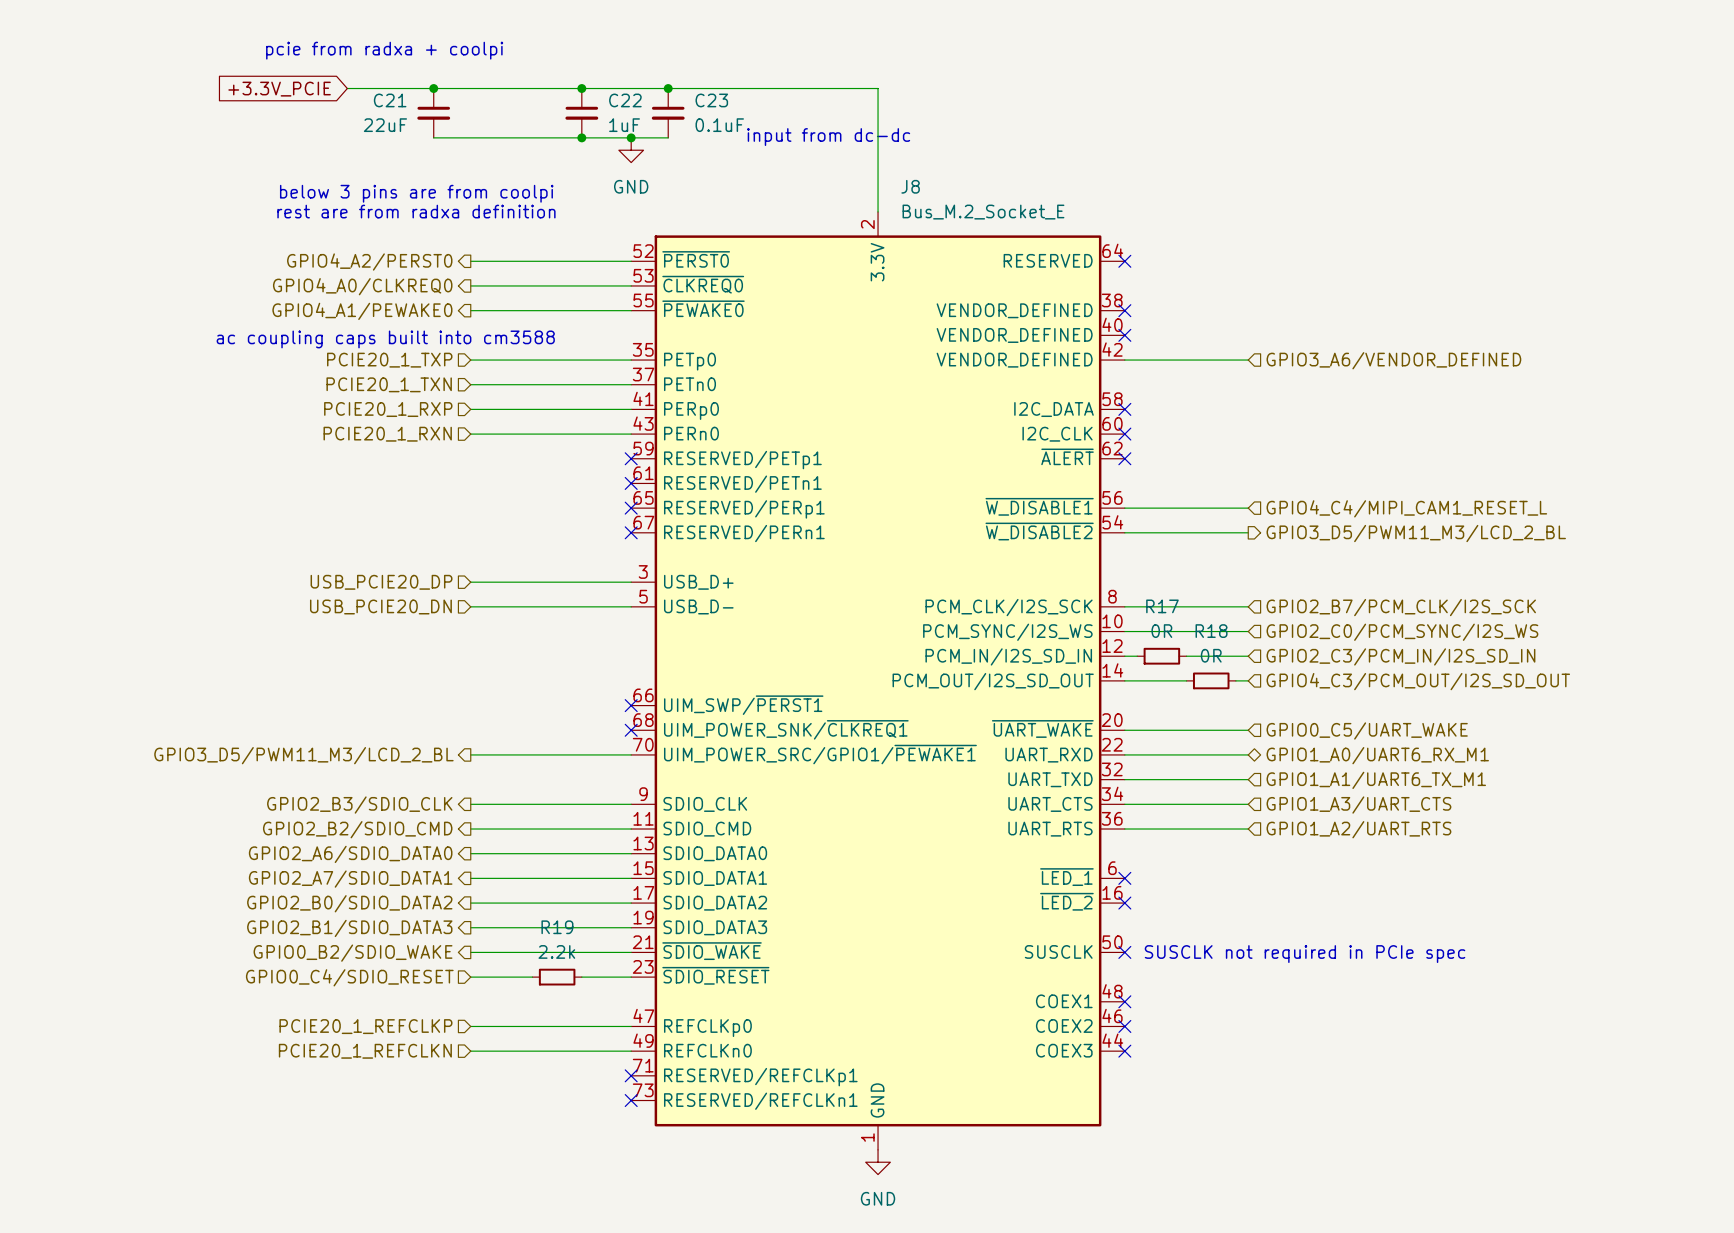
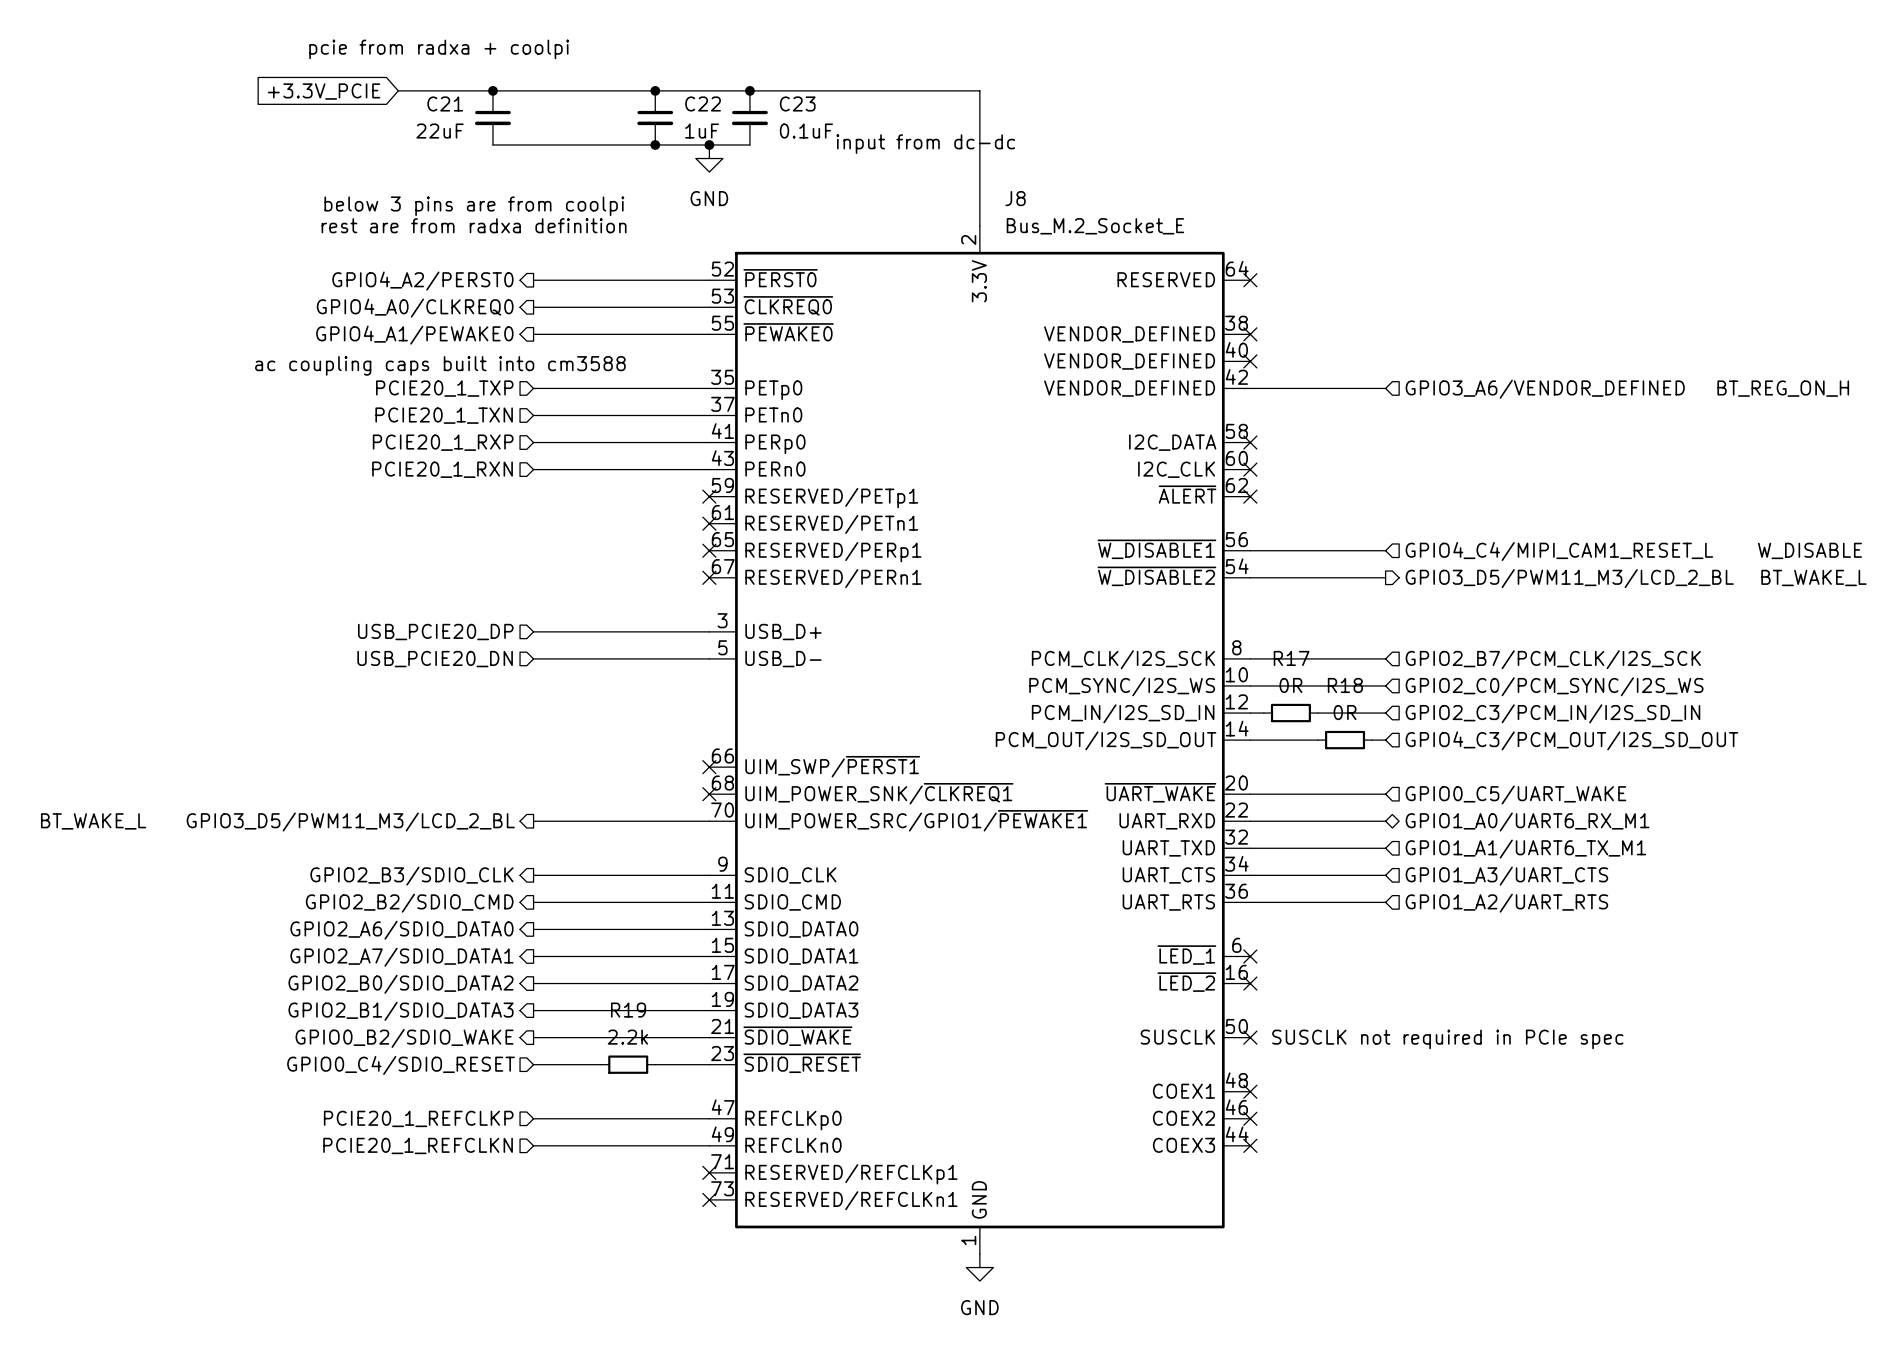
text: none -> BT_REG_ON_H (1783, 388)
text: none -> W_DISABLE (1809, 550)
text: none -> BT_WAKE_L (1813, 577)
text: none -> BT_WAKE_L (93, 821)

